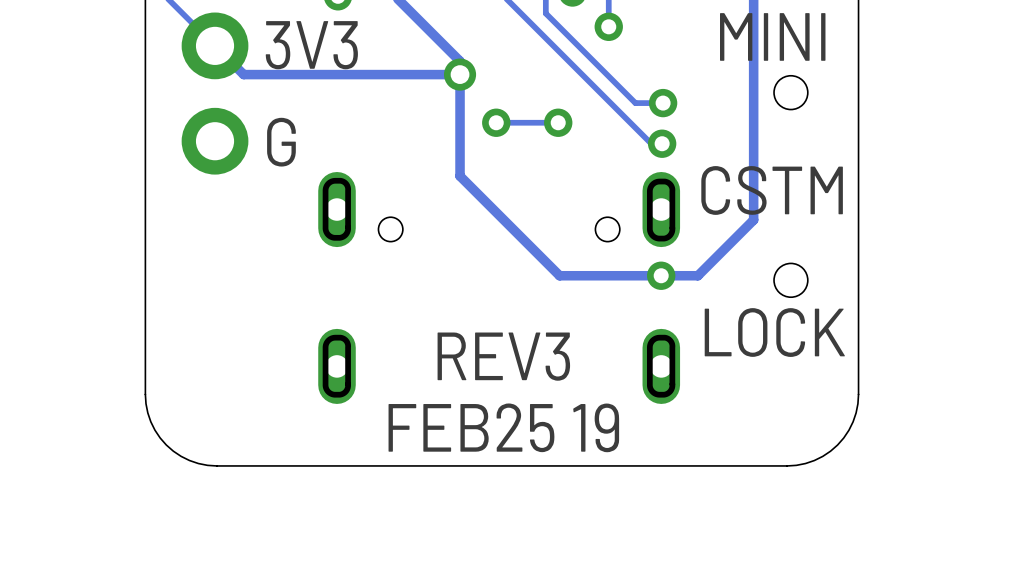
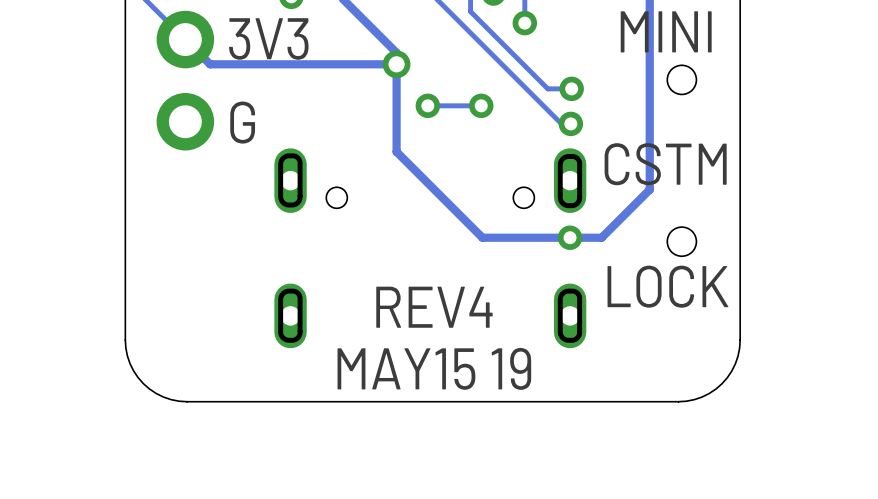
text: REV3 (503, 356) -> REV4 (434, 307)
text: FEB25 19 (503, 427) -> MAY15 19 (434, 368)

